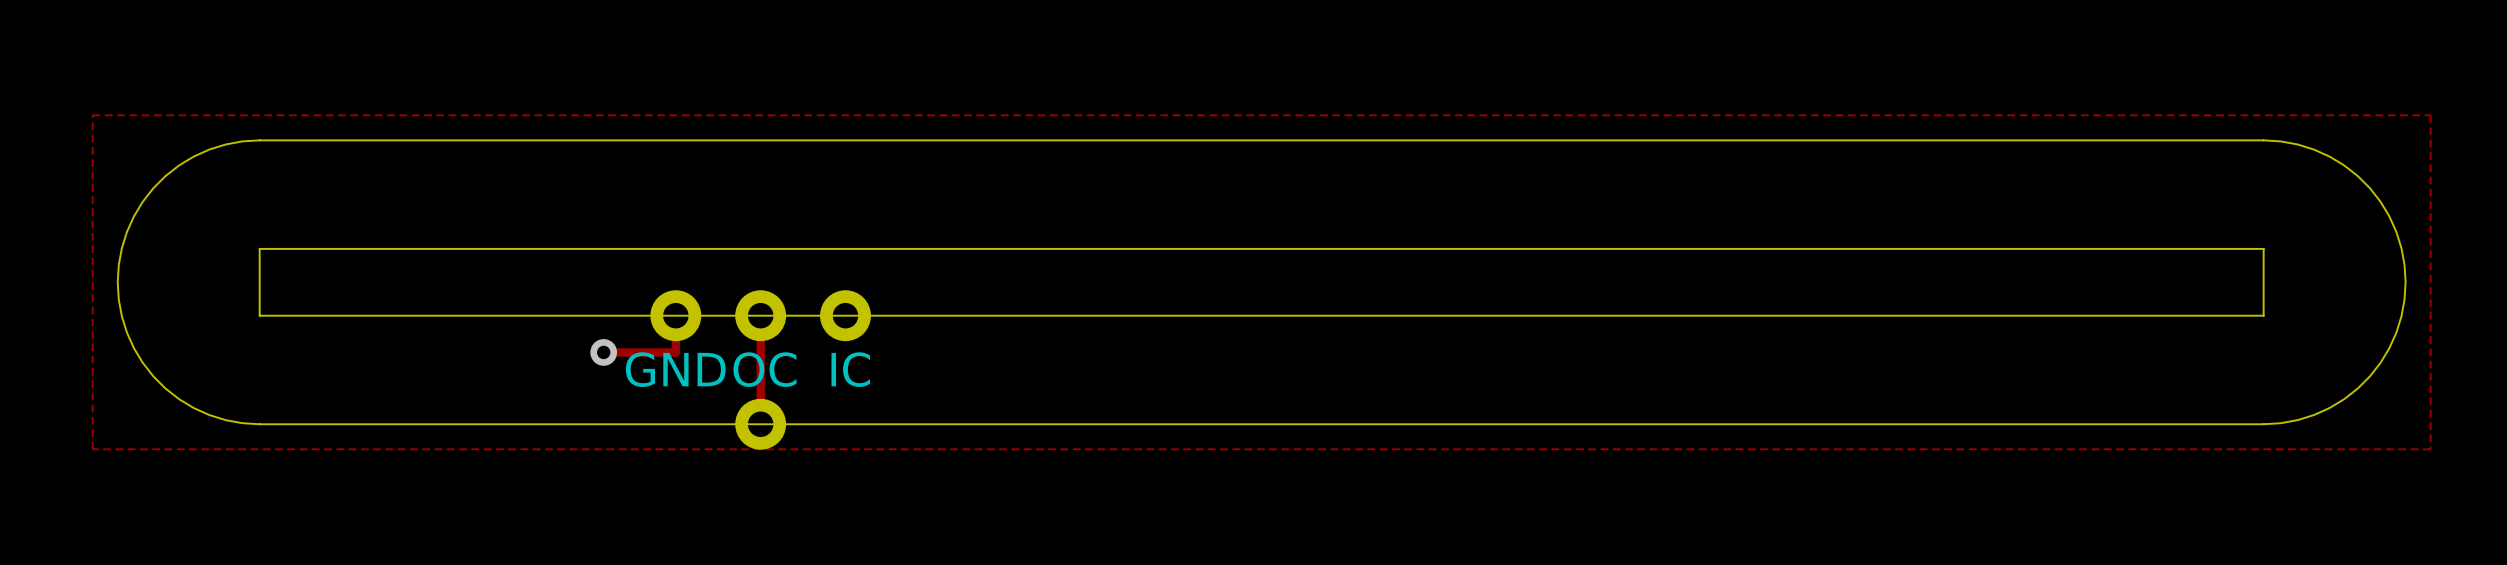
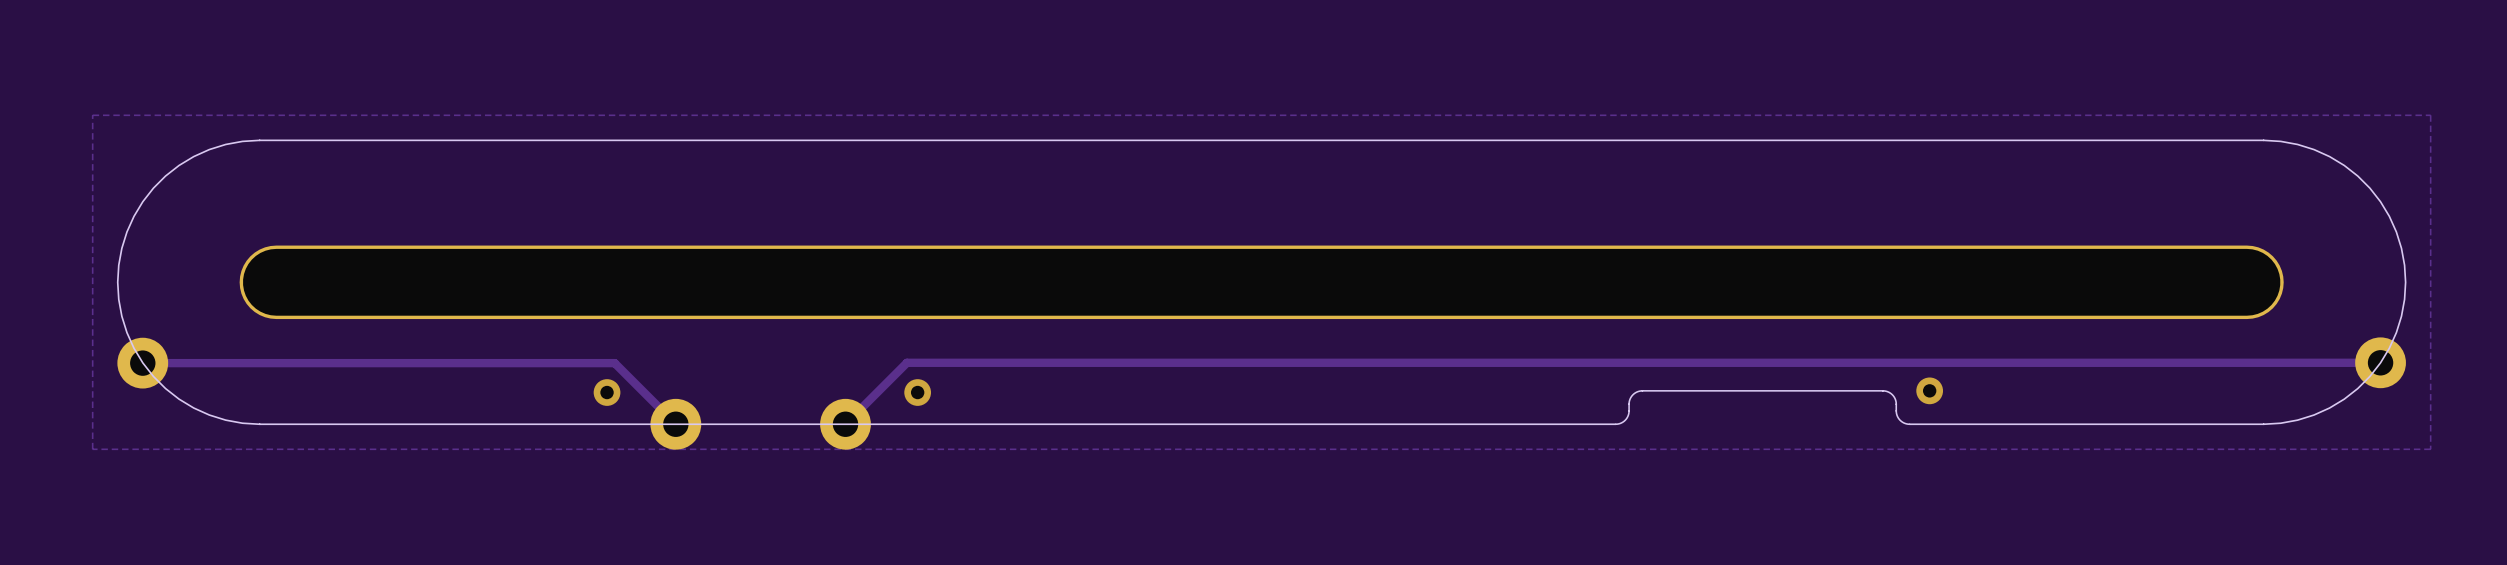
board edge: (259, 248) (2263, 248) (2263, 315) (259, 315) (259, 248) -> none
part: none -> (1261, 282)
part: (760, 315) -> none
track: (675, 327) (675, 352) (603, 352) -> none
track: (760, 327) (760, 412) -> none
via position: (603, 352) -> (607, 392)
track: none -> (2380, 362) (906, 362) (845, 424)
part: none -> (2380, 362)
track: none -> (142, 363) (614, 363) (675, 424)
part: none -> (142, 363)
via: none -> (1929, 390)
via: none -> (917, 392)
part: none -> (675, 424)
part: (760, 424) -> none
part: none -> (845, 424)
board edge: (1615, 424) (1909, 424) -> (1615, 424) (1626, 419) (1631, 397) (1635, 392) (1642, 390) (1884, 390) (1890, 392) (1894, 398) (1899, 419) (1909, 424)

